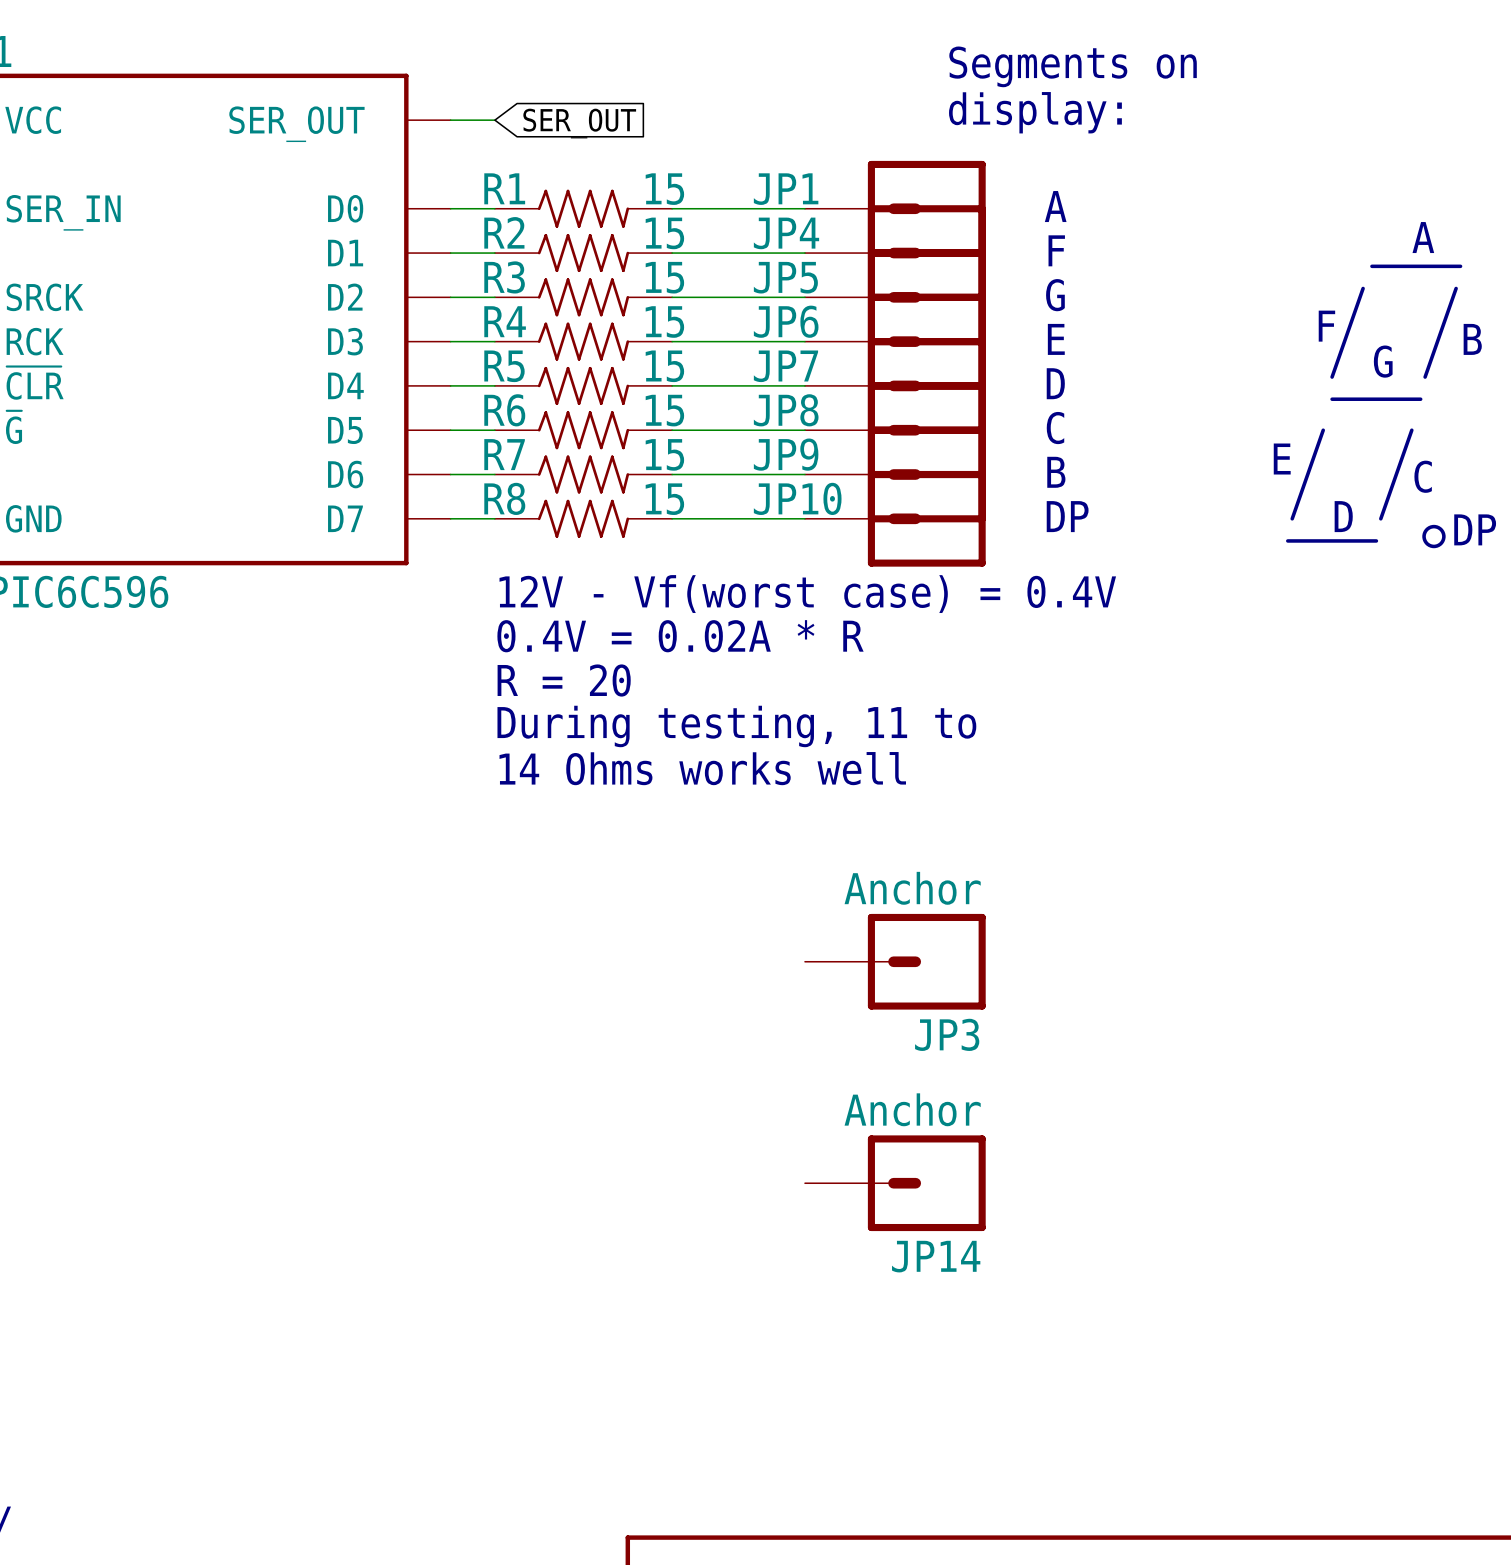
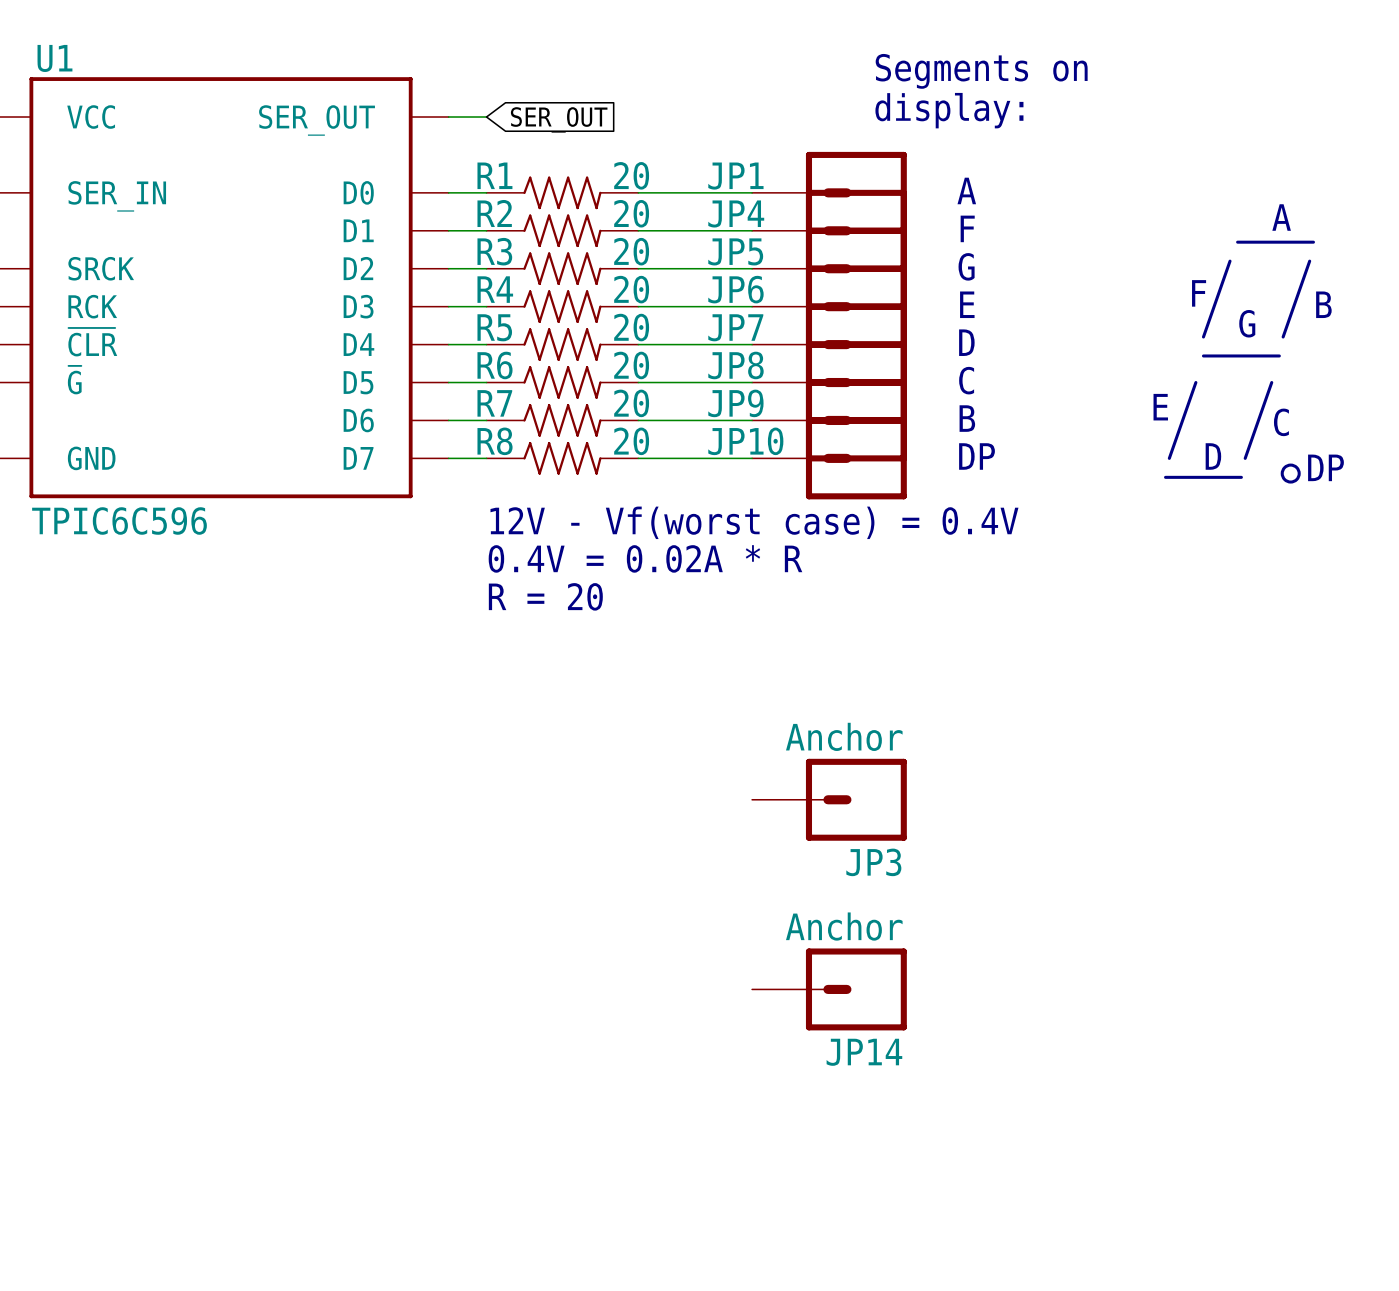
R1 value: 15 (664, 189) -> 20 (631, 175)
R2 value: 15 (664, 233) -> 20 (631, 213)
R3 value: 15 (664, 277) -> 20 (631, 251)
R4 value: 15 (664, 322) -> 20 (631, 289)
R5 value: 15 (664, 366) -> 20 (631, 327)
R6 value: 15 (664, 410) -> 20 (631, 365)
R7 value: 15 (664, 454) -> 20 (631, 403)
R8 value: 15 (664, 499) -> 20 (631, 441)
text: During testing, 11 to (736, 726) -> none
text: 14 Ohms works well (702, 768) -> none
JP3 position: (895, 961) -> (829, 799)
JP14 position: (895, 1183) -> (829, 989)

